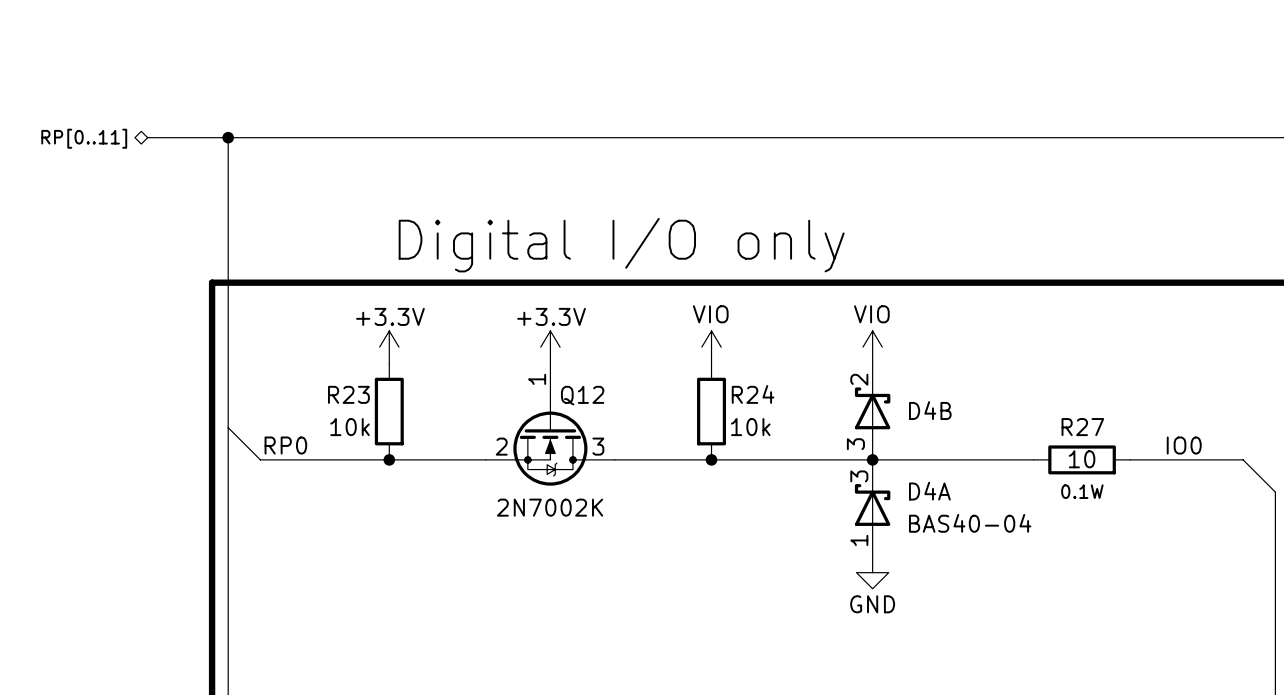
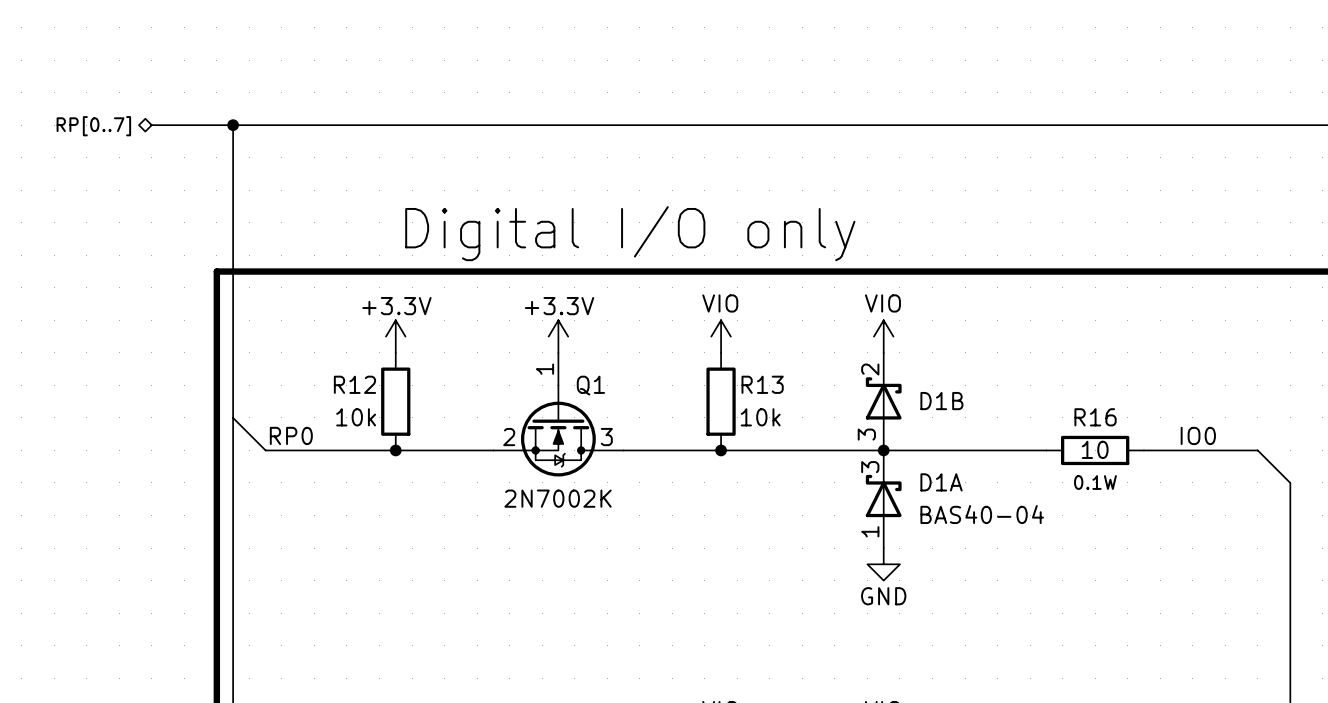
hierarchical label: RP[0..11] (84, 138) -> RP[0..7] (93, 126)
R23 name: R23 (348, 394) -> R12 (354, 384)
R24 name: R24 (753, 394) -> R13 (762, 384)
Q12 name: Q12 (582, 395) -> Q1 (590, 385)
D4B name: D4B (930, 410) -> D1B (941, 401)
R27 name: R27 (1082, 427) -> R16 (1095, 417)
D4A name: D4A (929, 491) -> D1A (941, 482)

